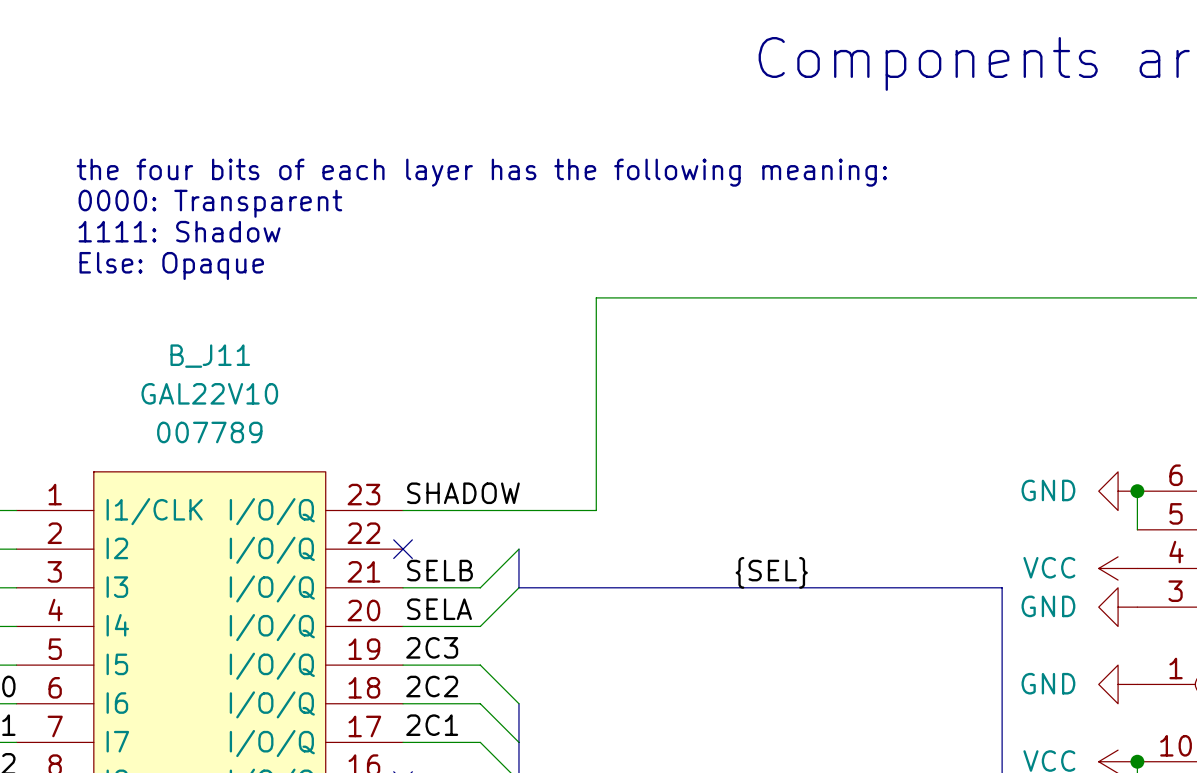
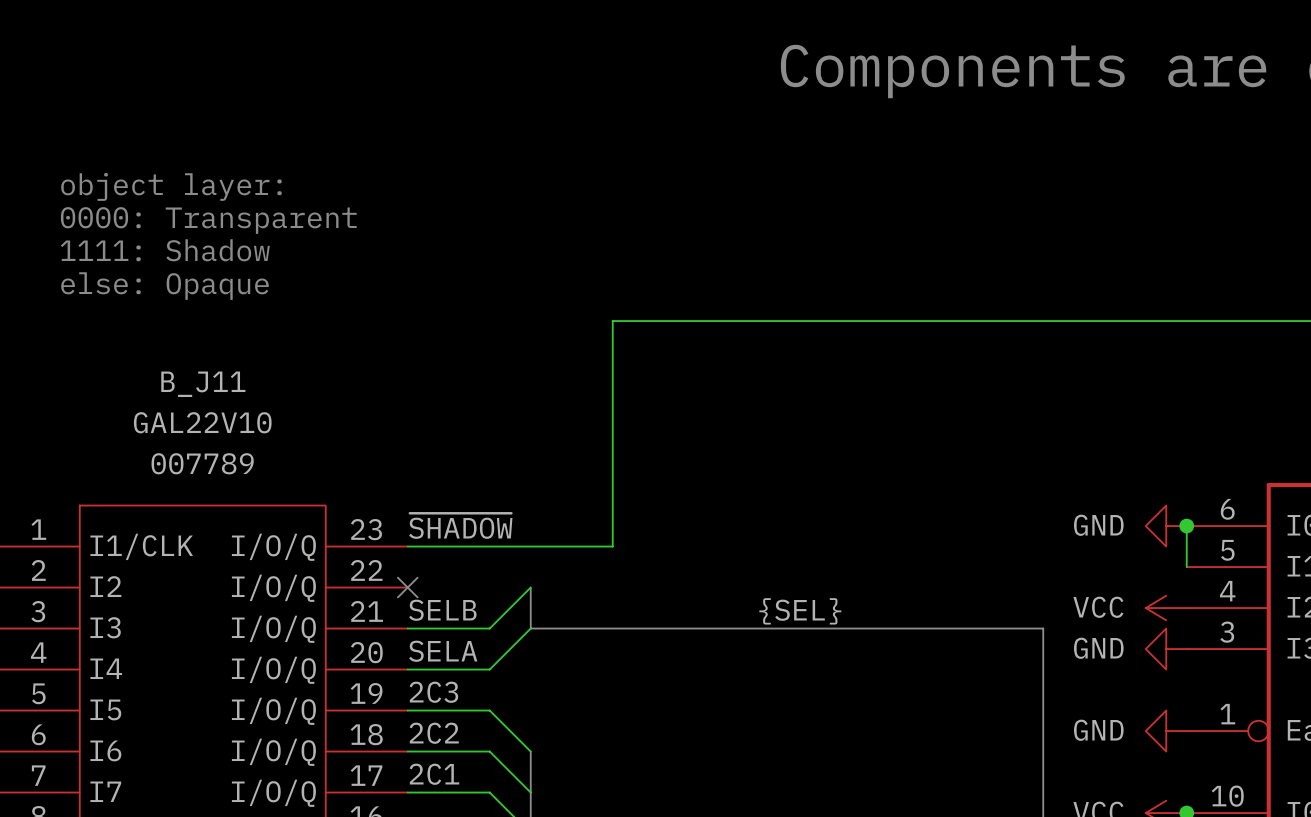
text: the four bits of each layer has the following meaning: (481, 172) -> object layer: (171, 186)
text: Else: Opaque (171, 265) -> else: Opaque (164, 286)
label: SHADOW (463, 493) -> ~{SHADOW} (460, 526)

